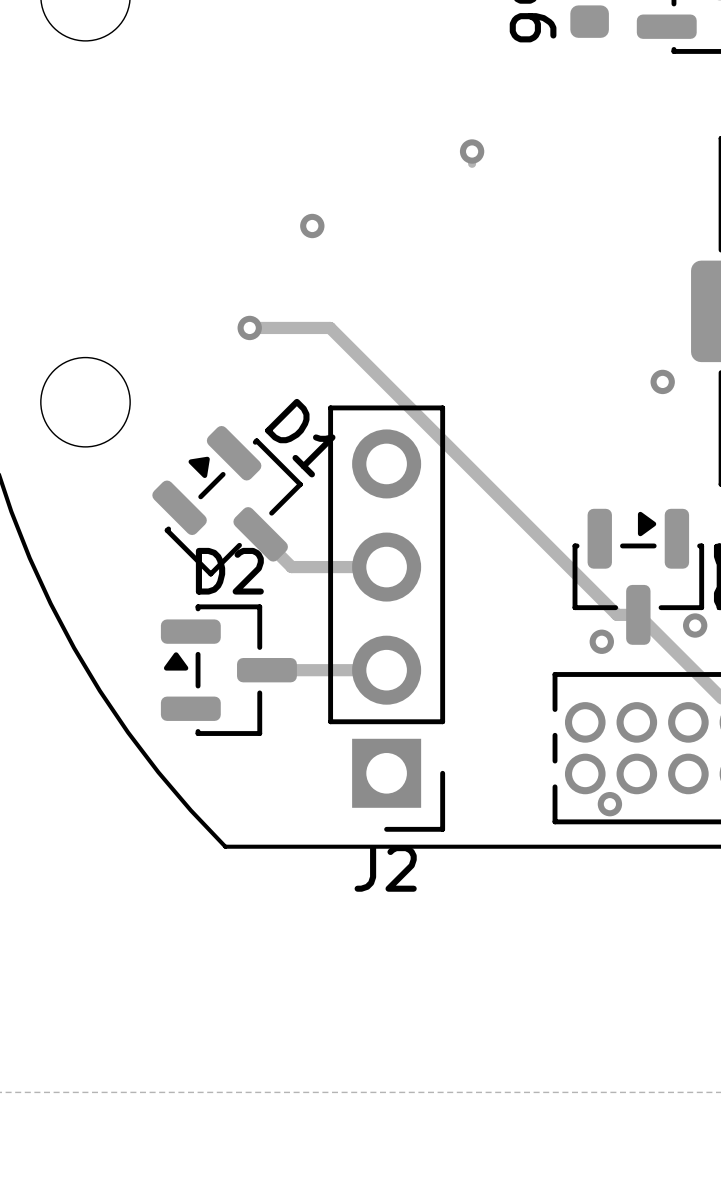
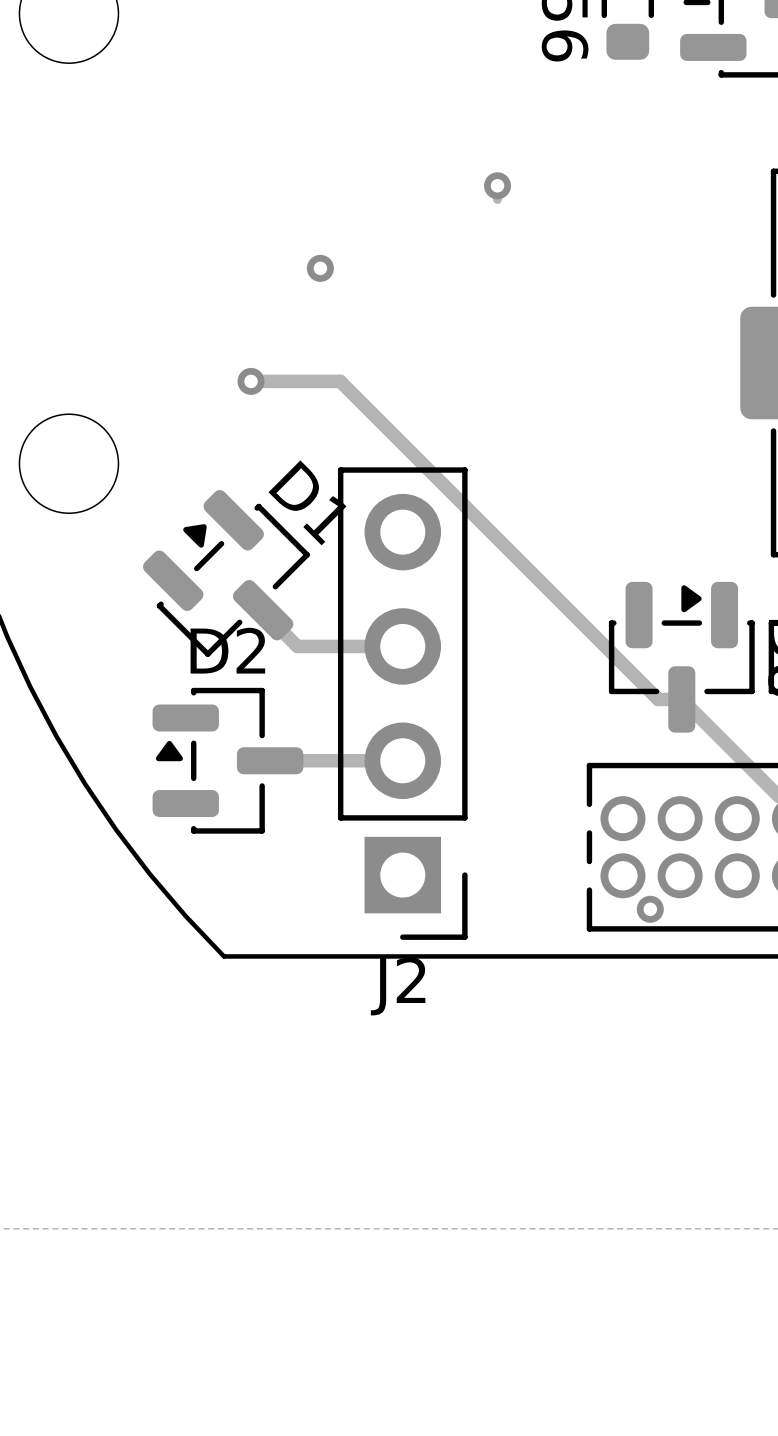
via: (662, 381) -> none
via: (695, 625) -> none
via: (601, 641) -> none

